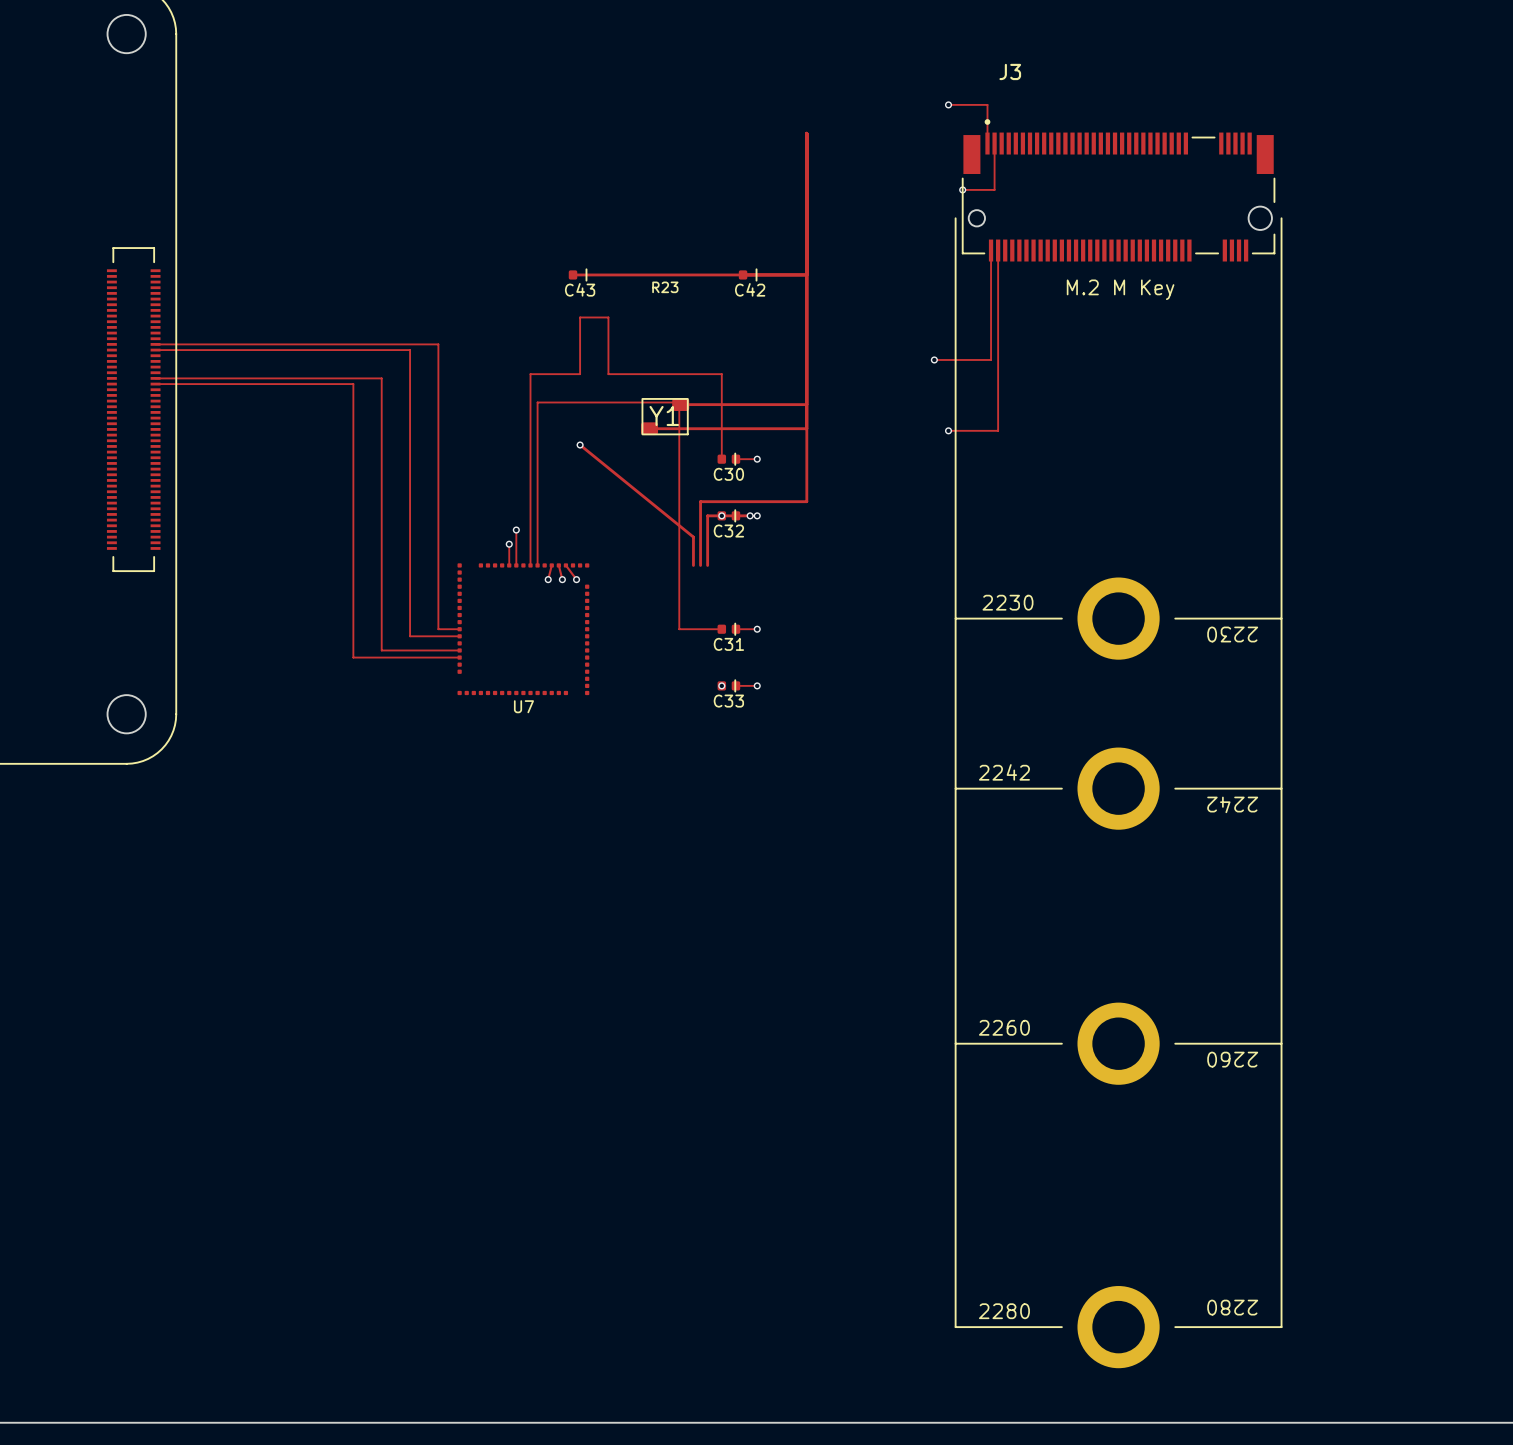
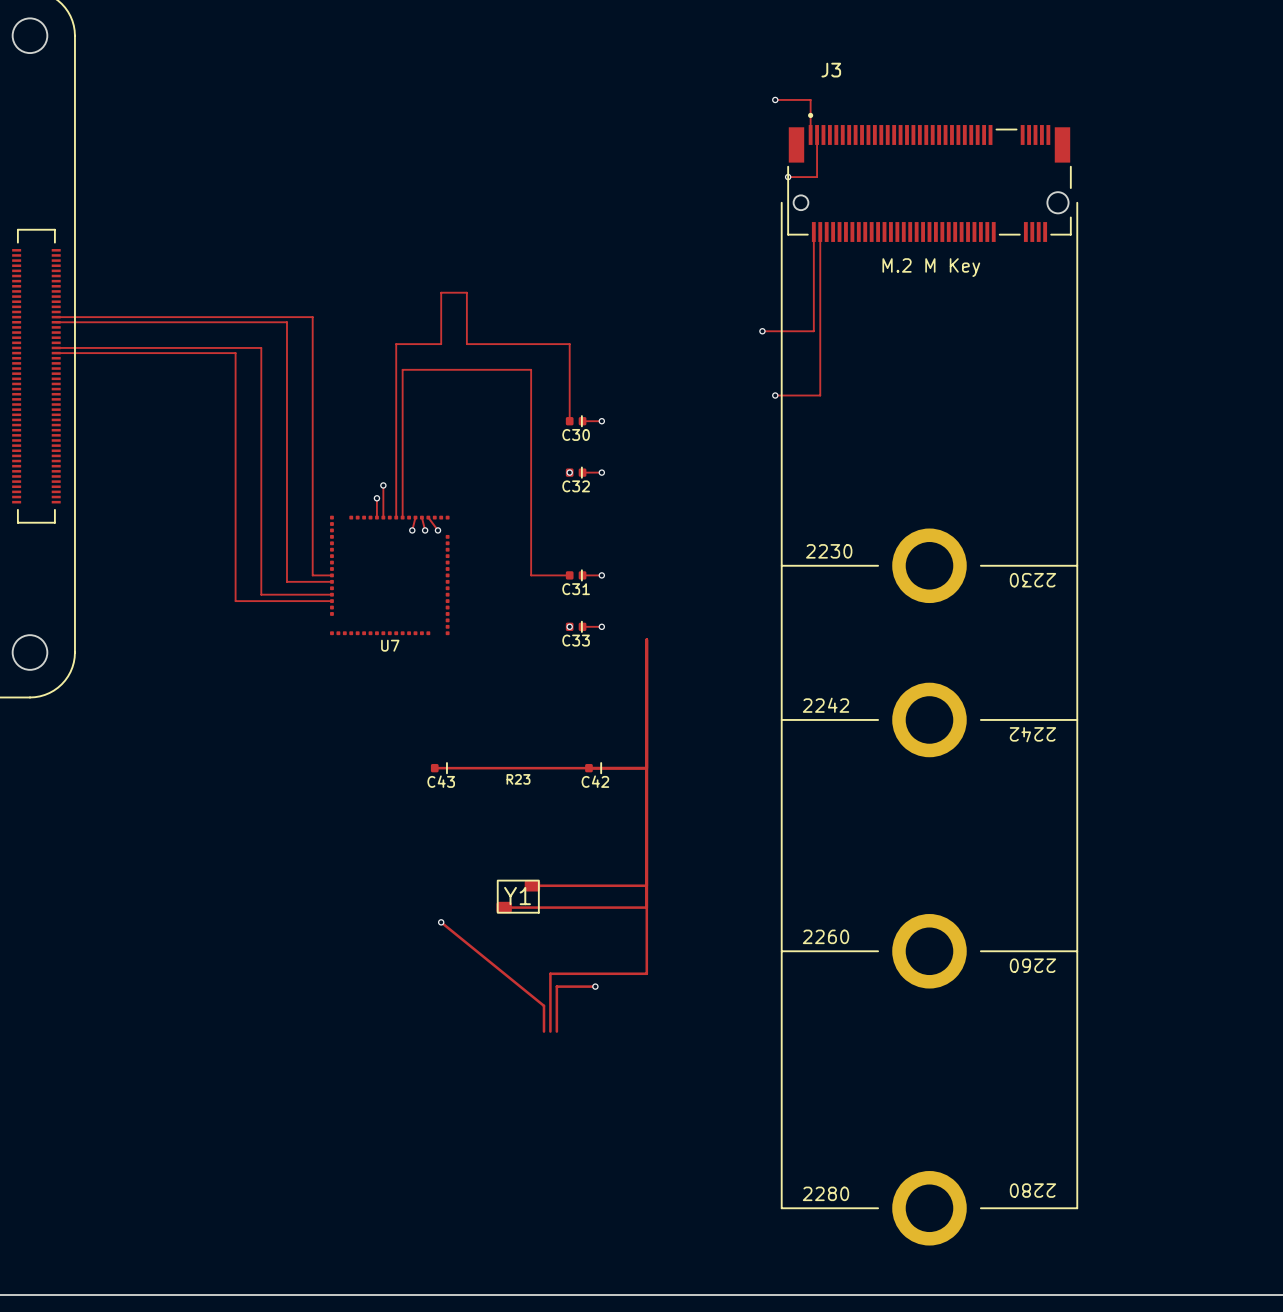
track: (806, 133) (806, 501) (700, 501) (700, 565) -> none
track: (573, 274) (806, 274) -> none
C43 position: (578, 274) -> (439, 768)
C42 position: (748, 274) -> (593, 768)
R23 position: (665, 287) -> (518, 779)
track: (680, 404) (806, 404) -> none
Y1 position: (665, 416) -> (518, 896)
track: (649, 428) (806, 428) -> none
track: (580, 445) (693, 537) (693, 565) -> none
via: (580, 445) -> none
track: (750, 515) (707, 515) (707, 565) -> none
via: (750, 515) -> none
track: none -> (646, 639) (646, 973) (550, 973) (550, 1031)
track: none -> (434, 768) (646, 768)
track: none -> (532, 885) (646, 885)
track: none -> (504, 907) (646, 907)
track: none -> (441, 922) (543, 1005) (543, 1031)
via: none -> (441, 922)
track: none -> (595, 986) (556, 986) (556, 1031)
via: none -> (595, 986)

